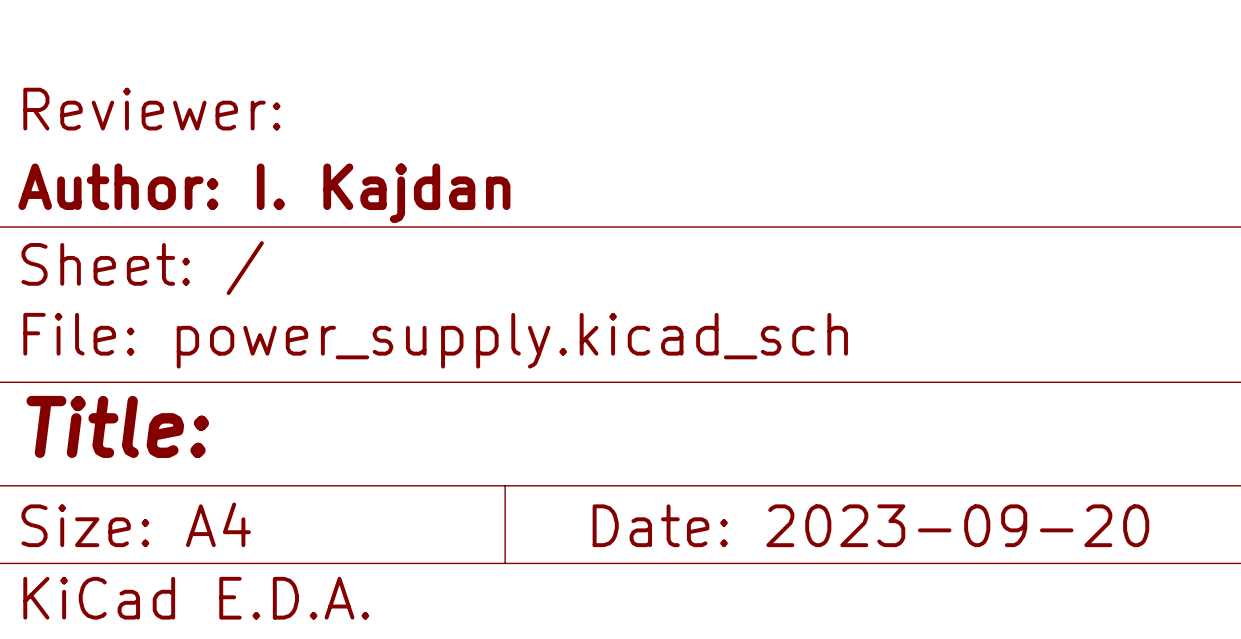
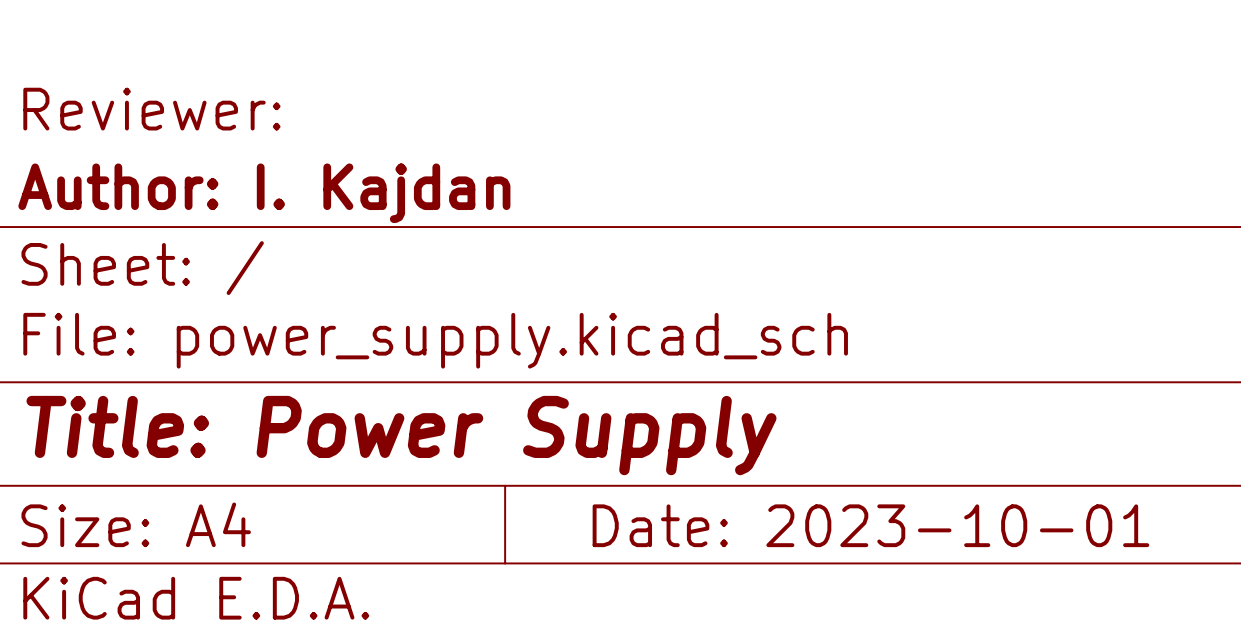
title block: Title: (117, 426) -> Title: Power Supply (401, 435)
title block: Date: 2023-09-20 (870, 525) -> Date: 2023-10-01 (870, 525)

